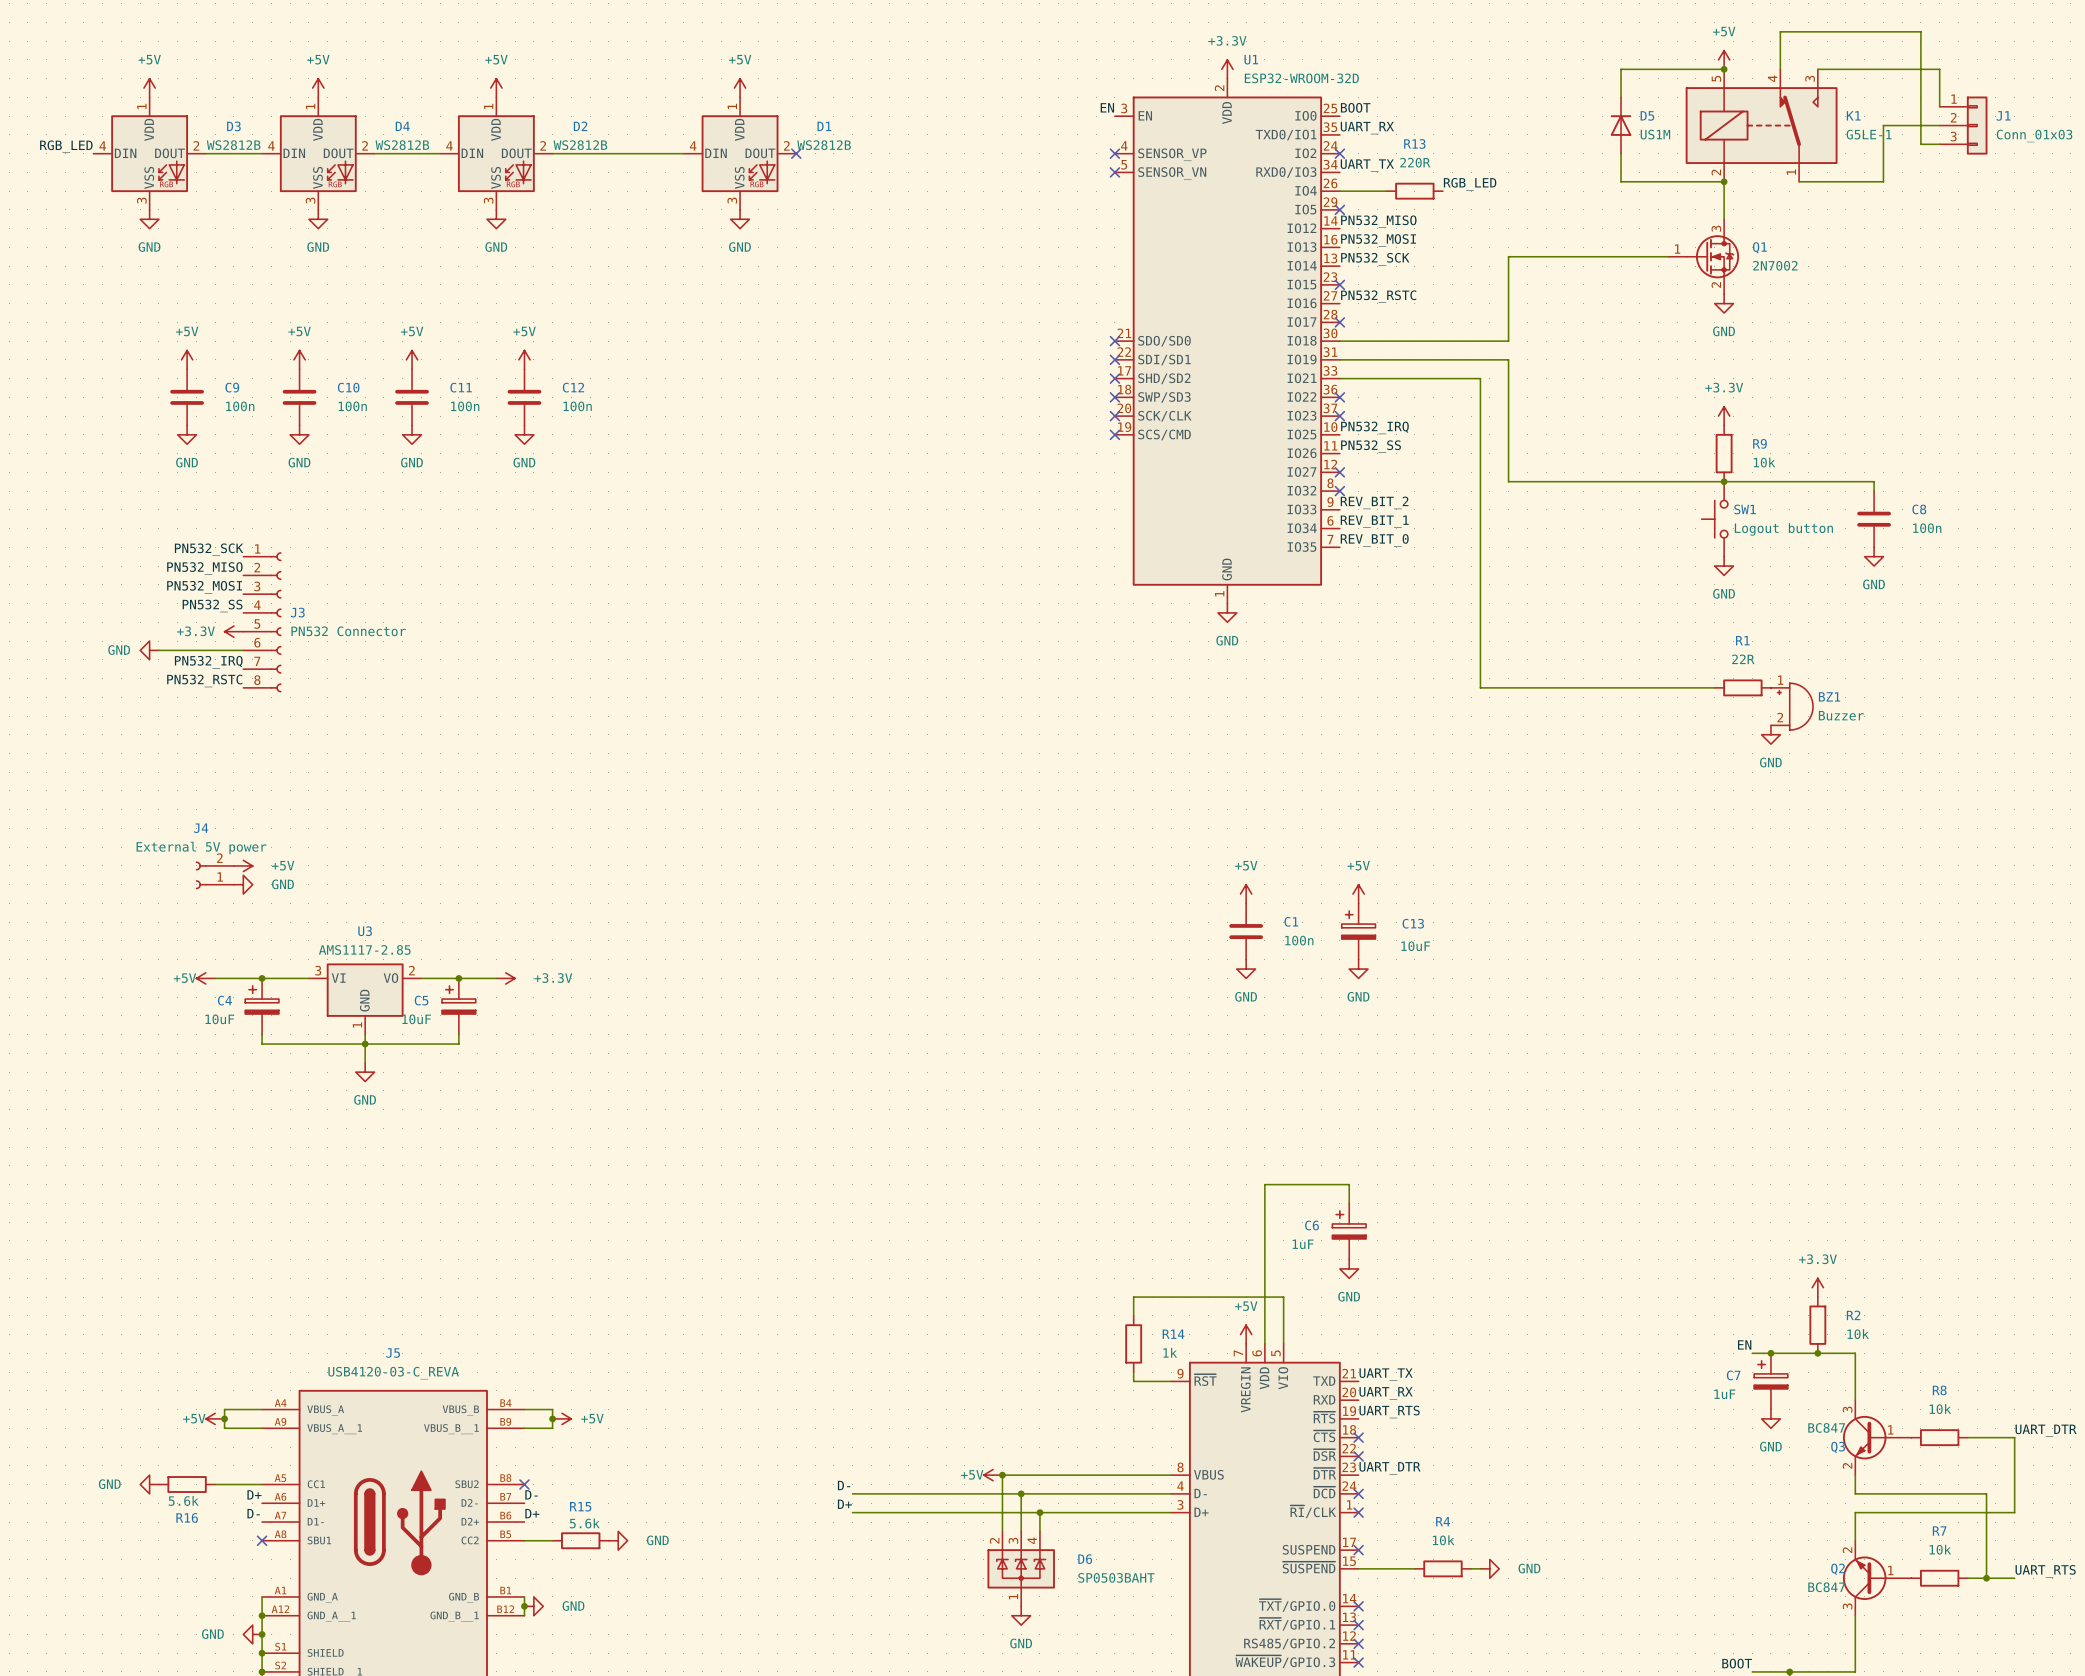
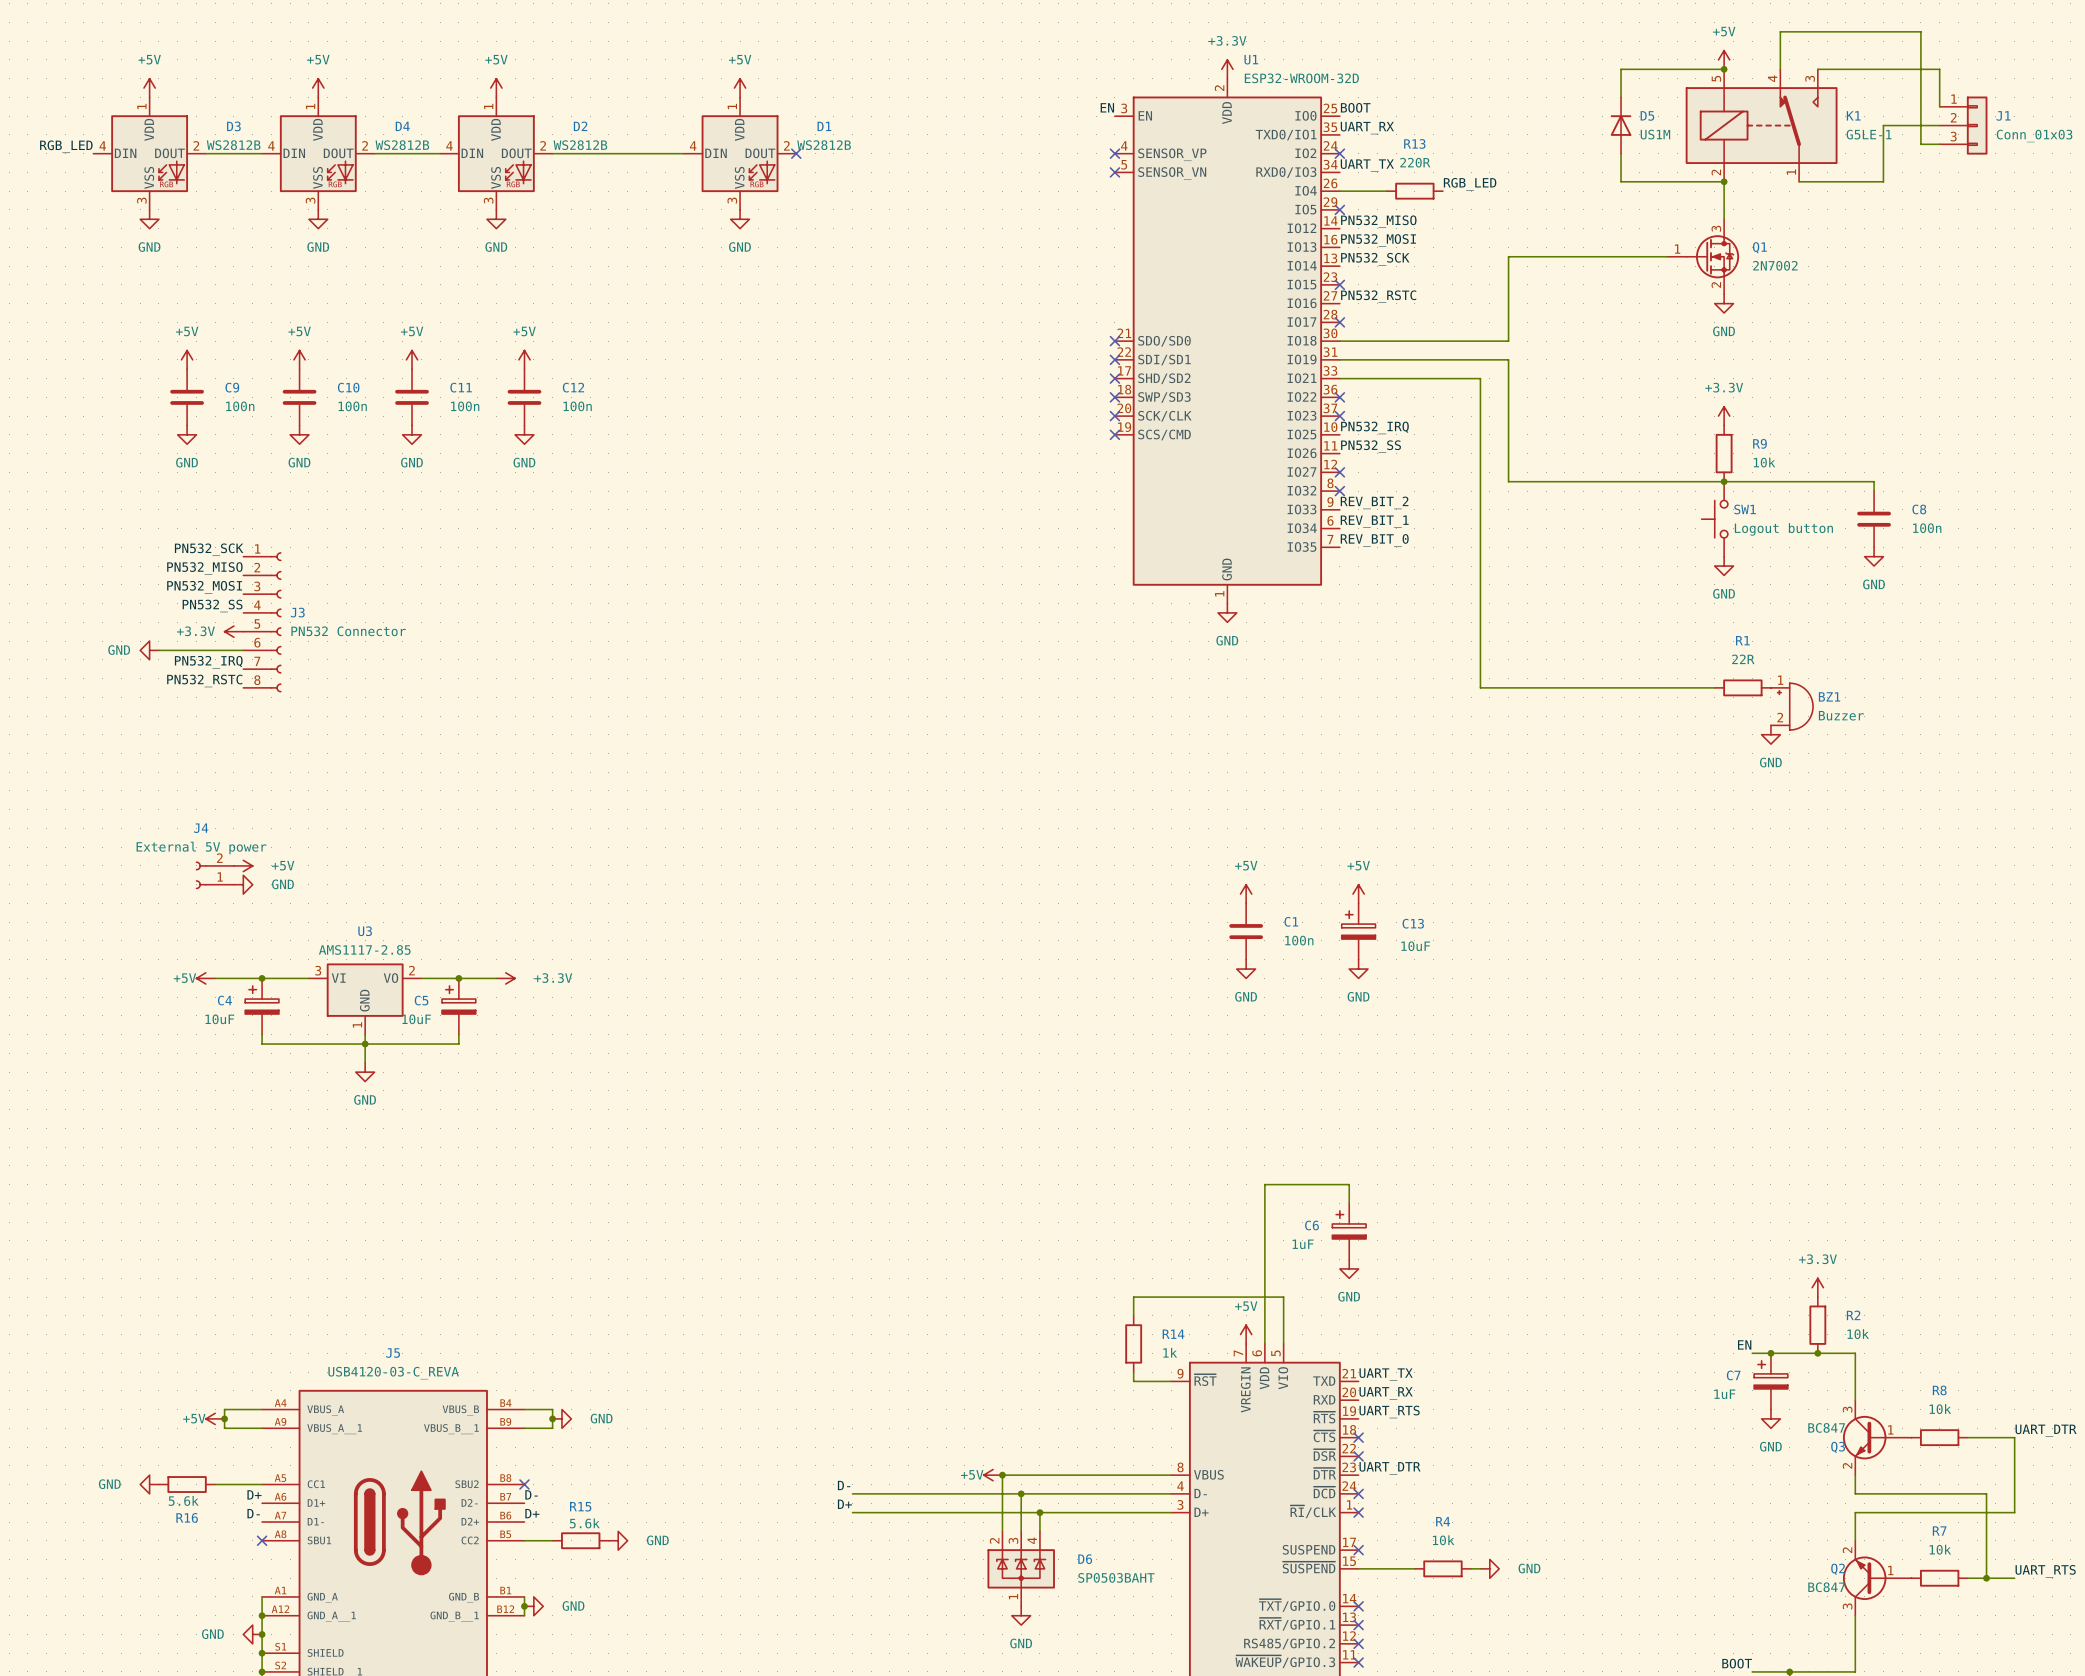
power symbol: +5V (561, 1418) -> GND (561, 1418)

